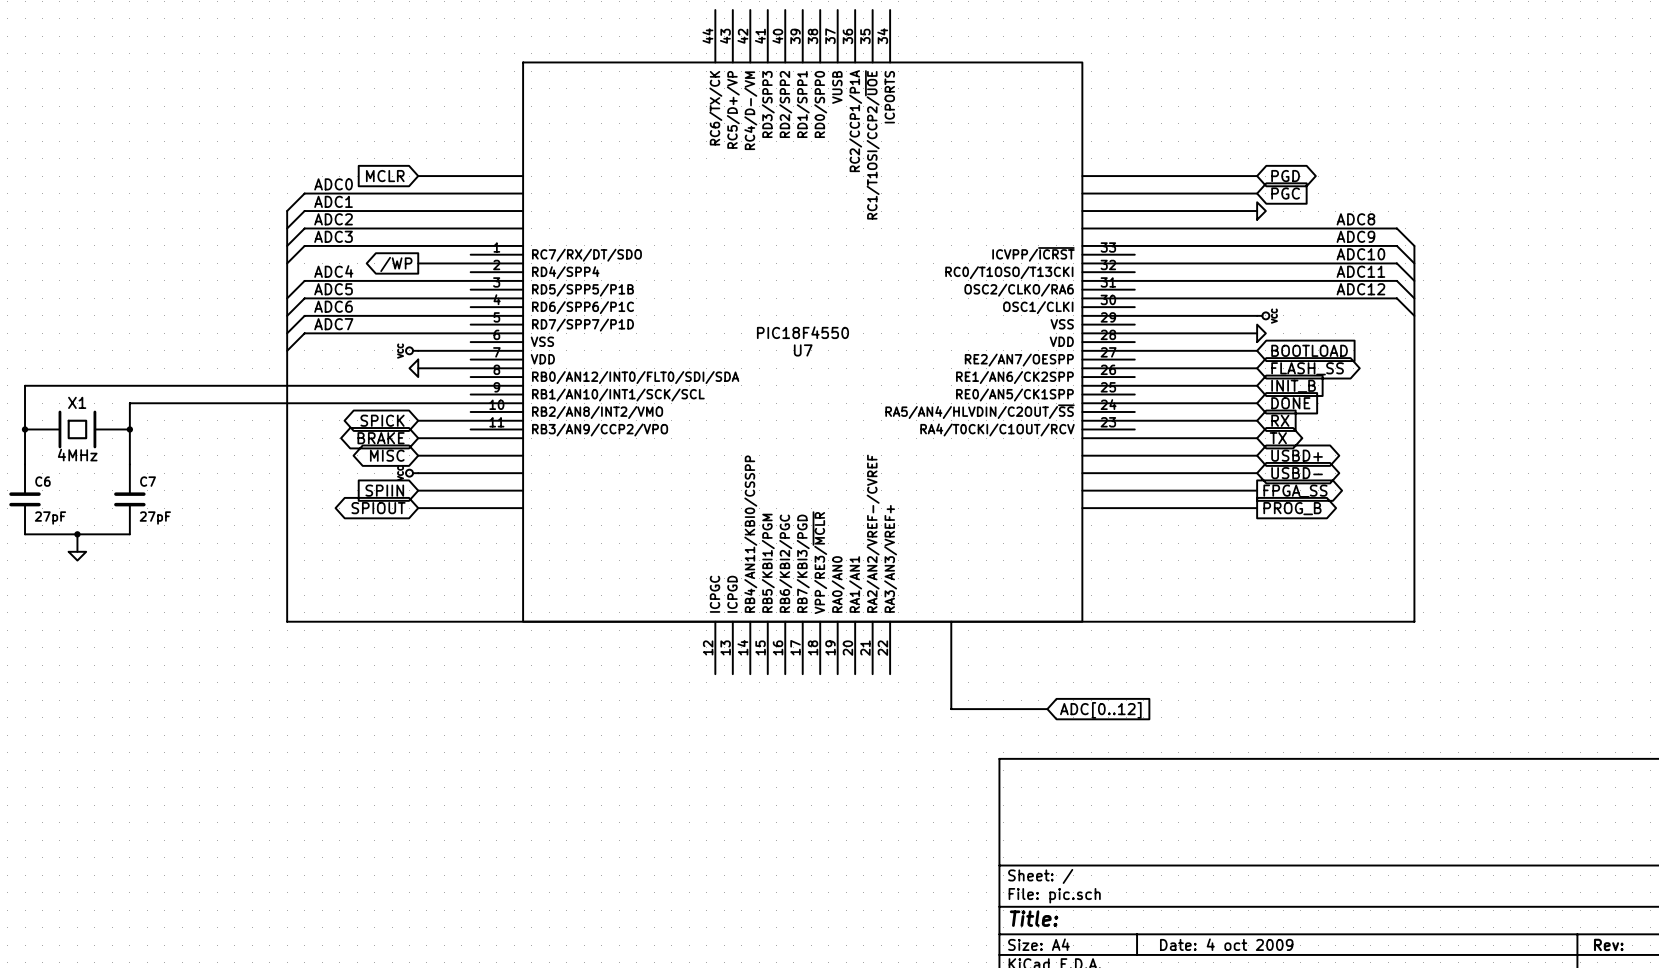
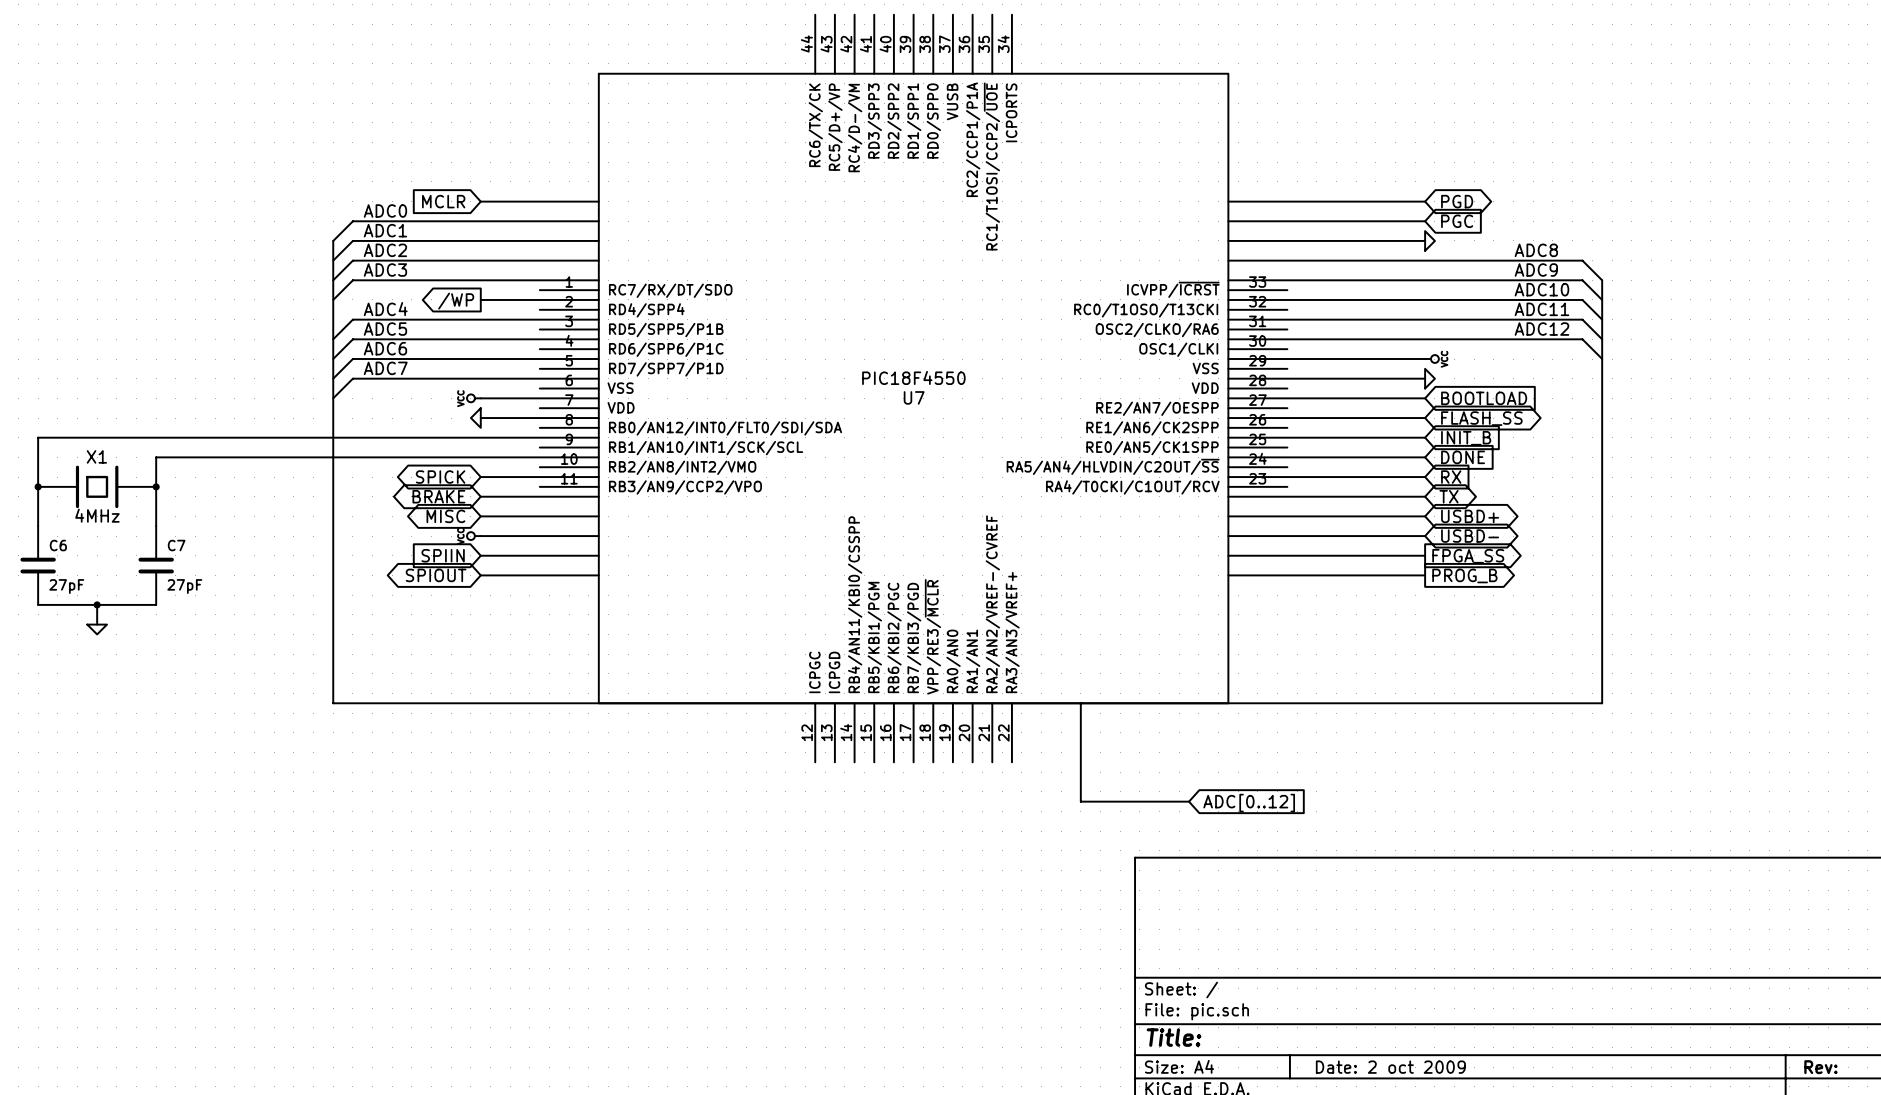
title block: Date: 4 oct 2009 (1226, 944) -> Date: 2 oct 2009 (1390, 1067)

